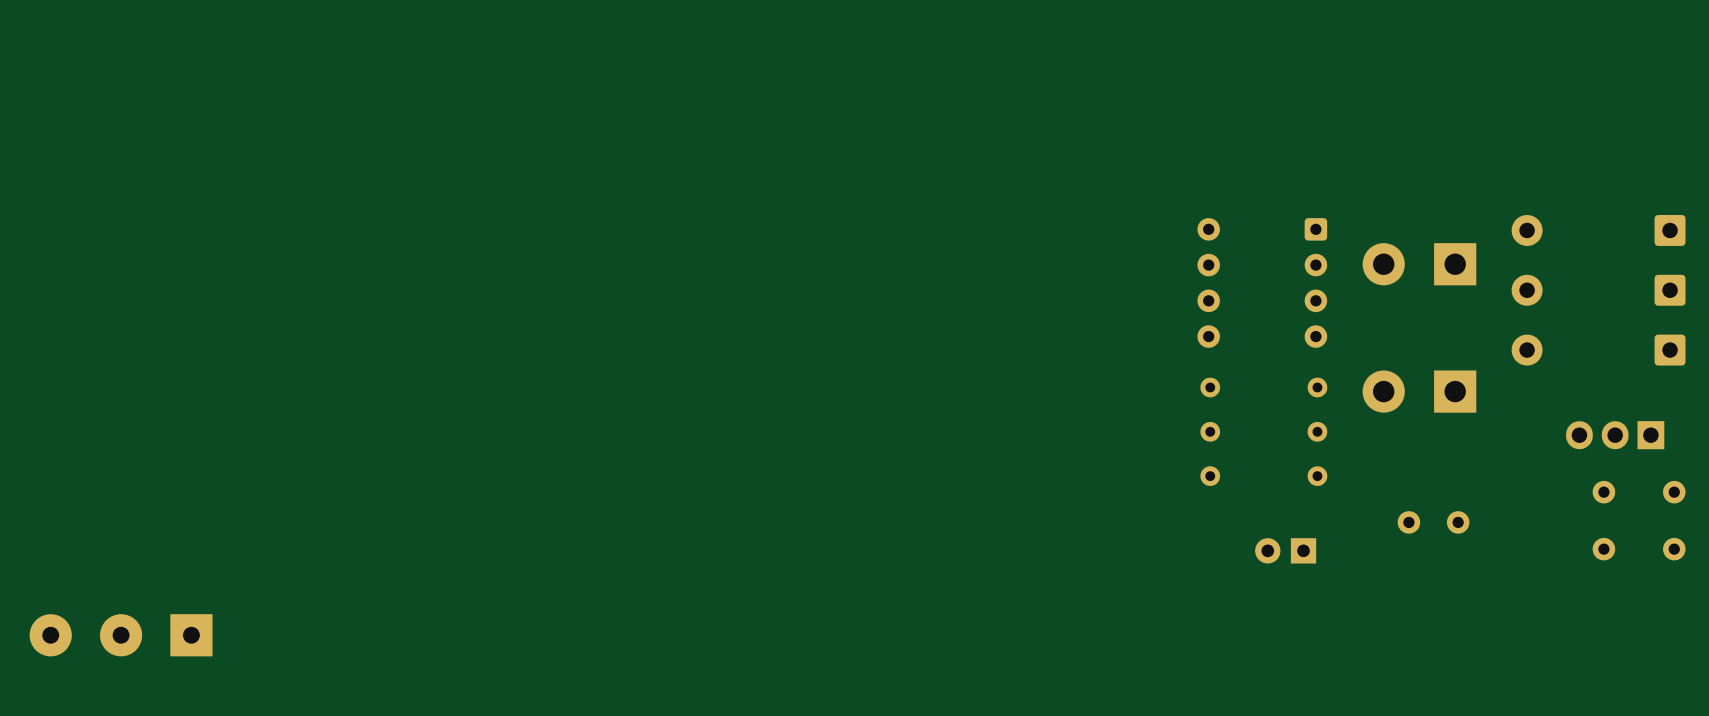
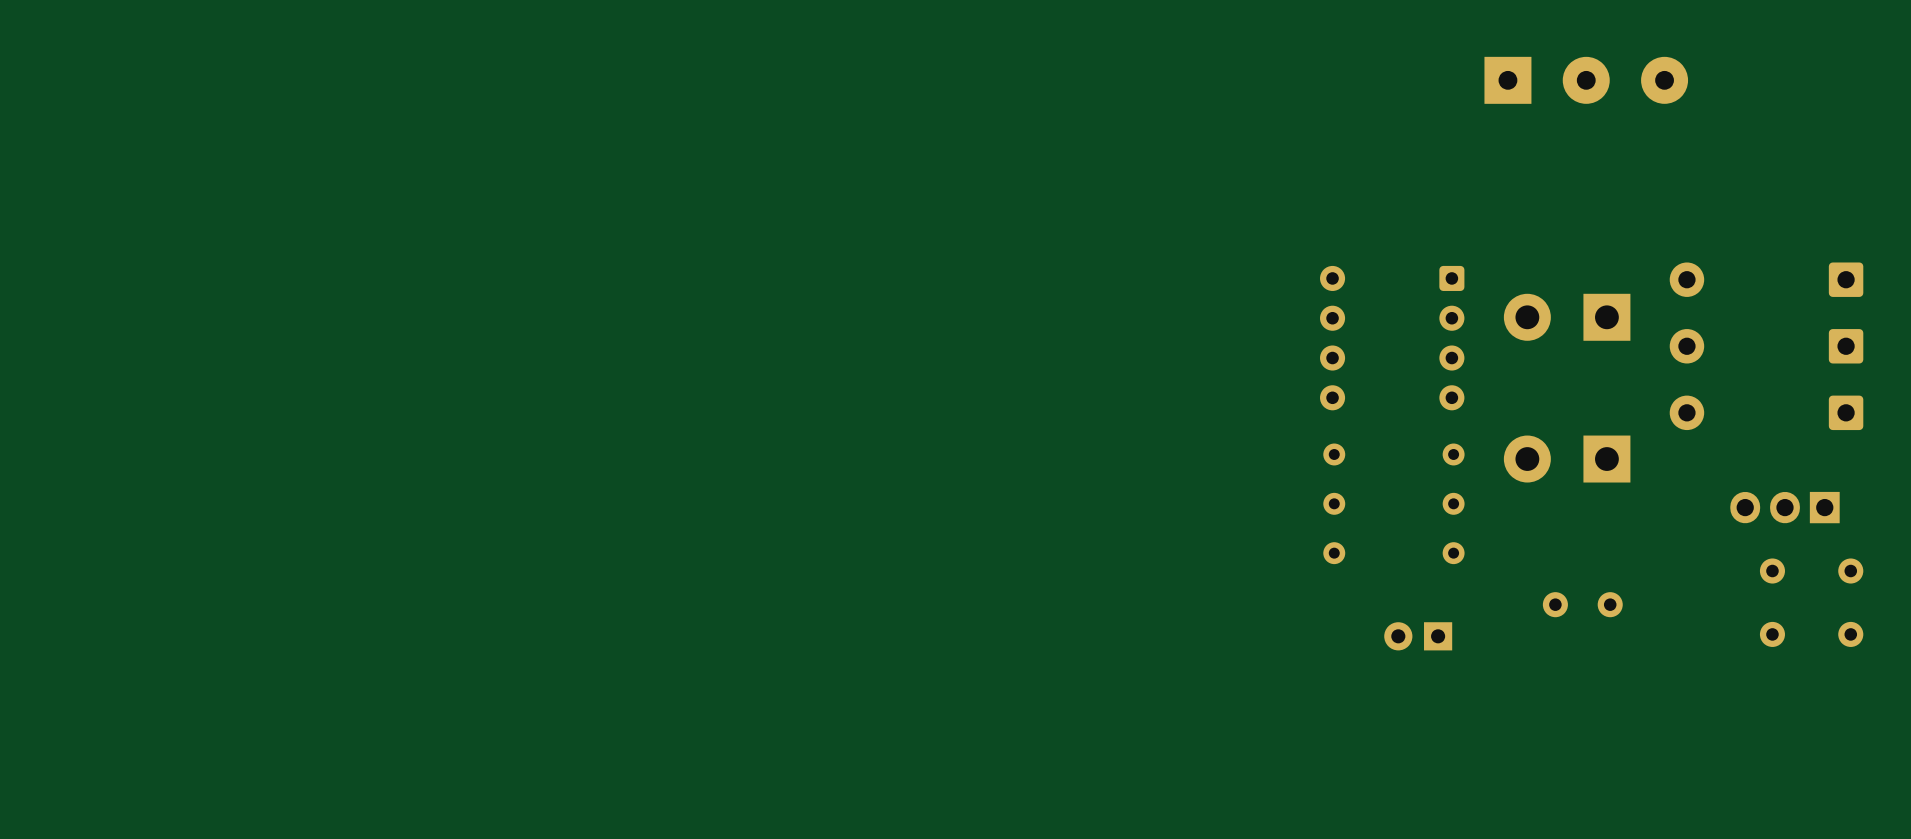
part: none -> (1586, 80)
part: (121, 635) -> none

